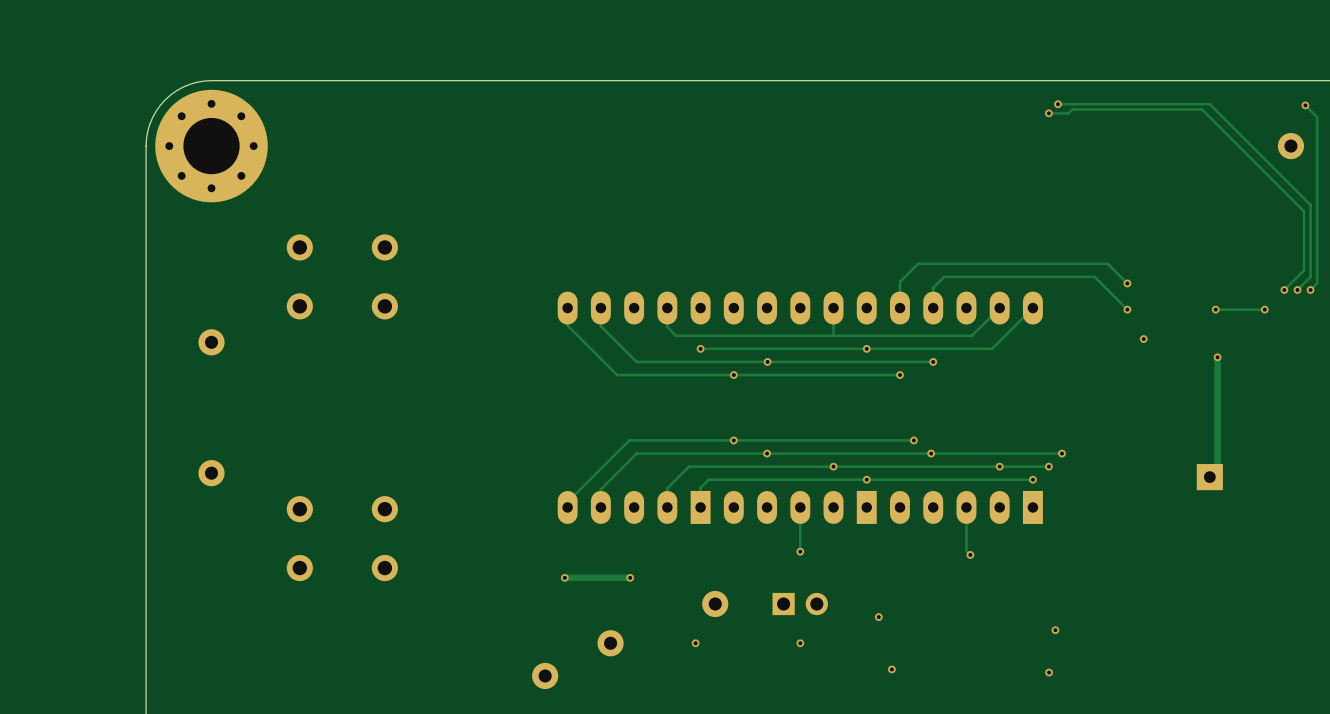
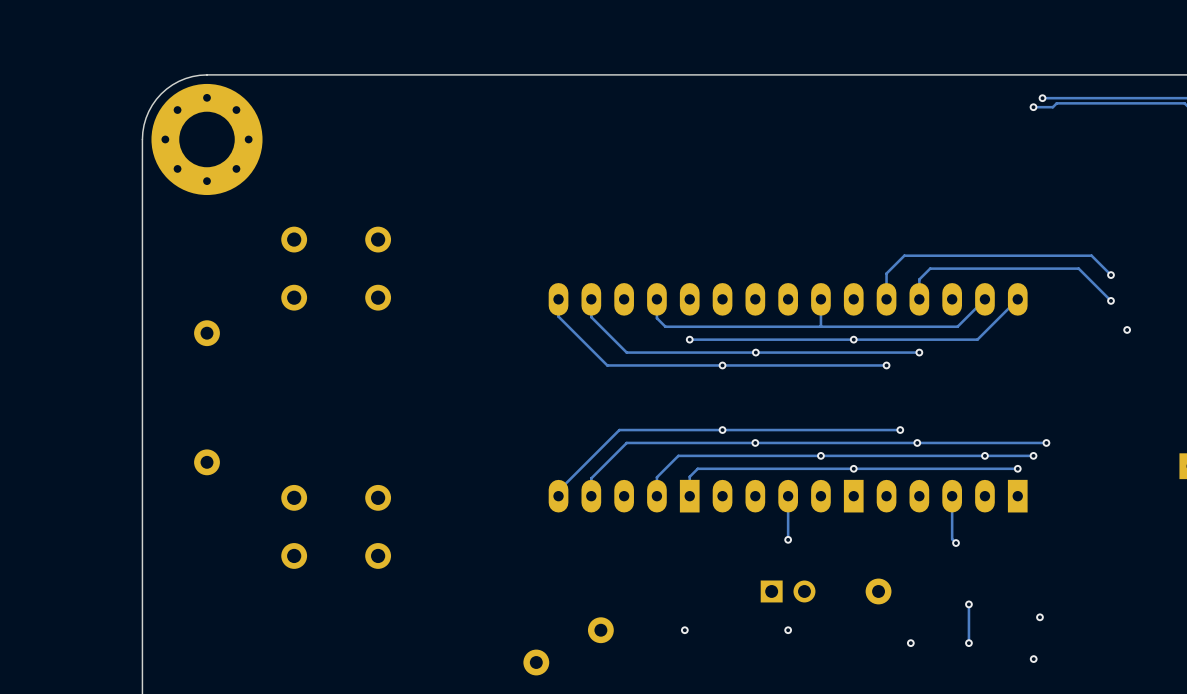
via: (564, 577) -> none
track: (630, 577) (564, 577) -> none
via: (630, 577) -> none
part position: (715, 604) -> (878, 591)
via: (878, 617) -> none
track: none -> (968, 604) (968, 643)
via: none -> (968, 604)
via: none -> (910, 643)
via: none -> (968, 643)
via: (891, 669) -> none

